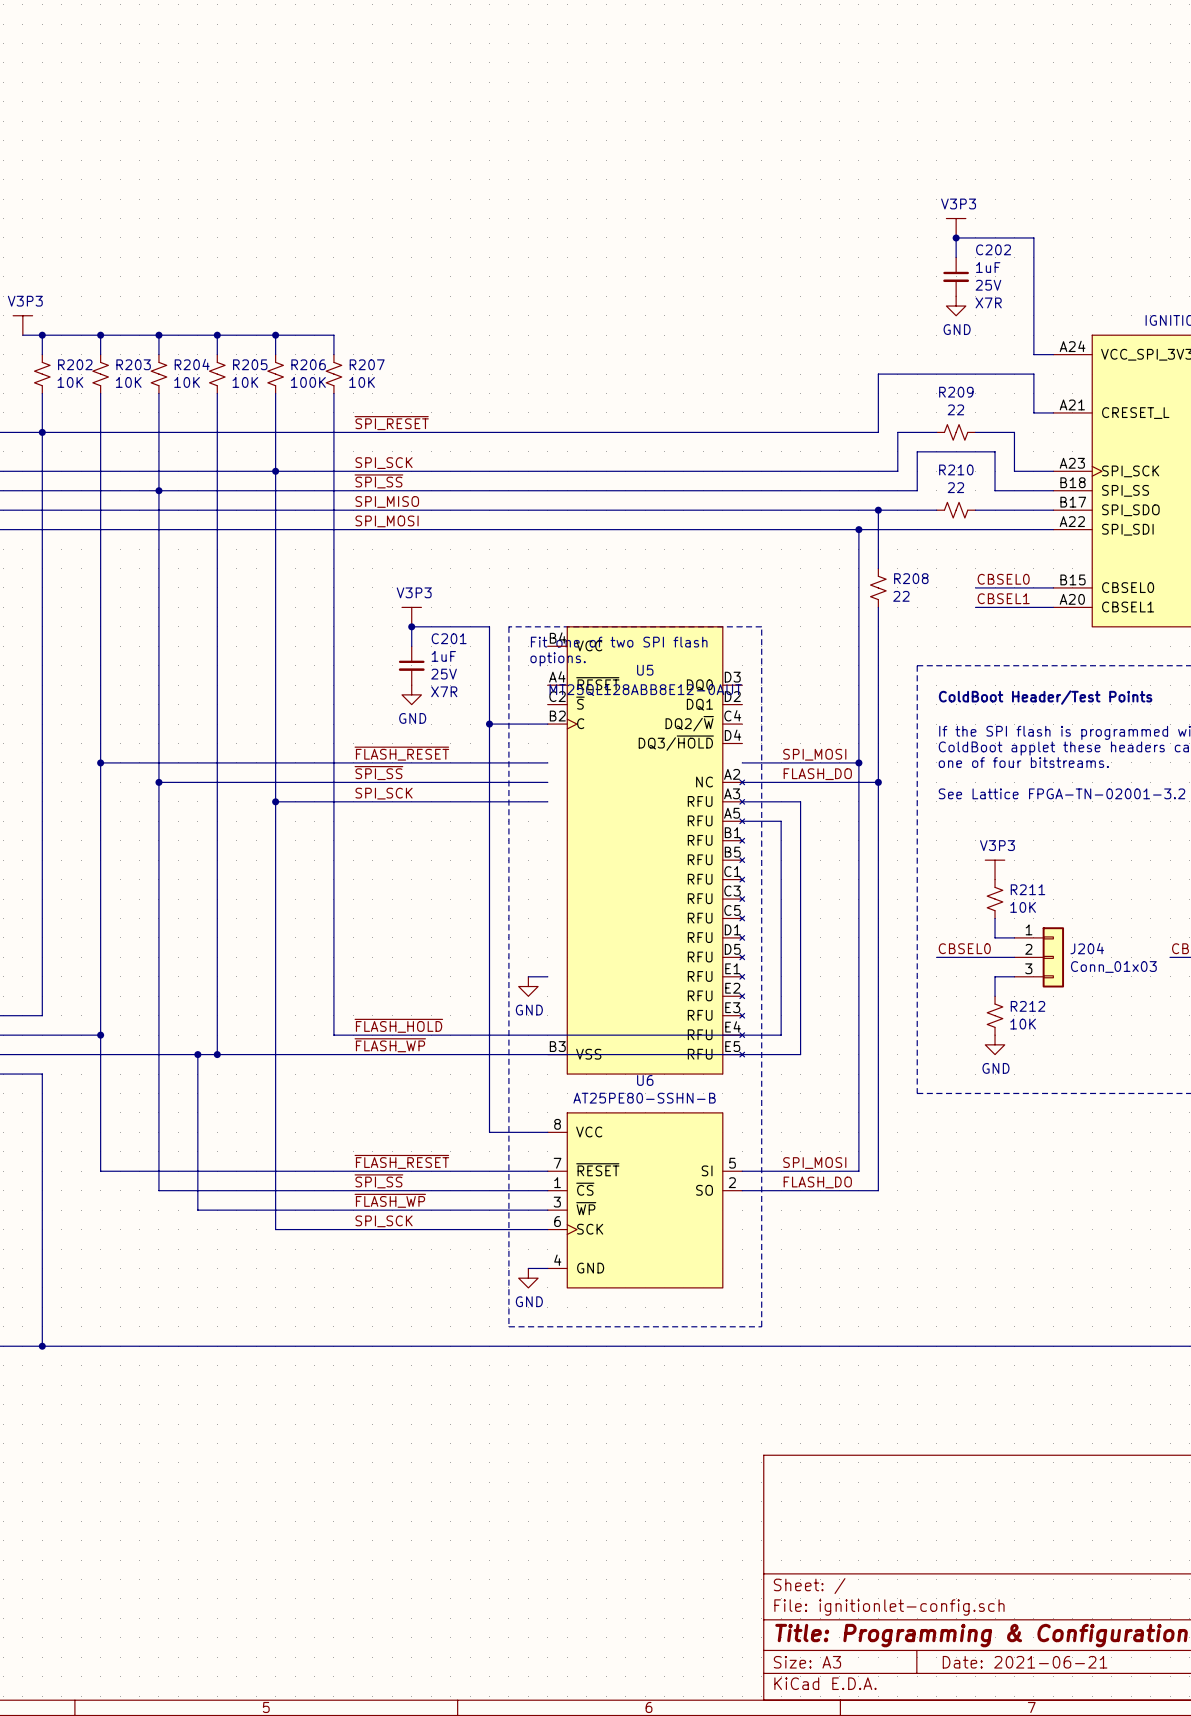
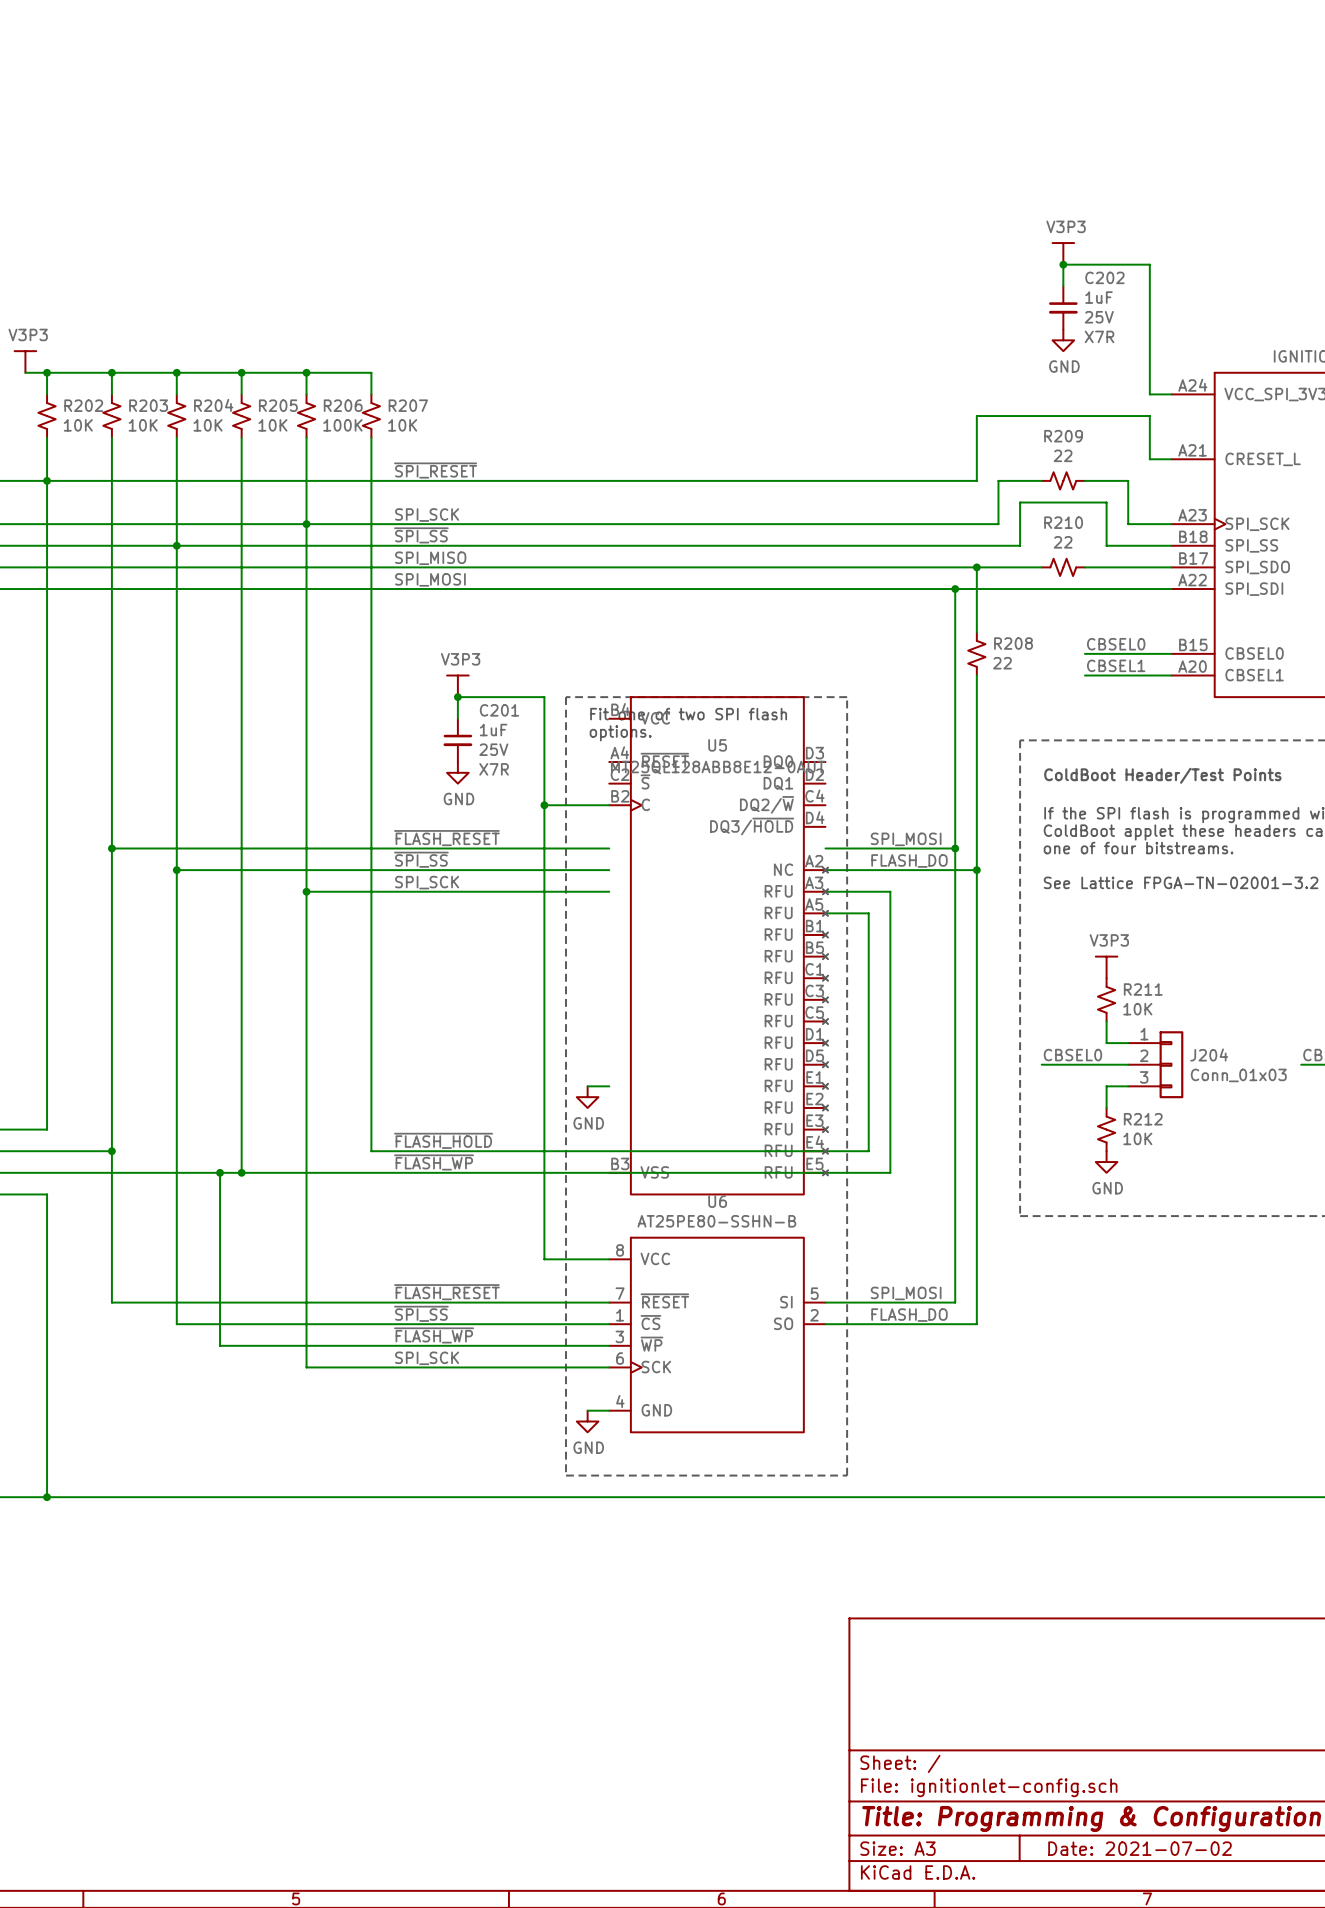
title block: Date: 2021-06-21 (1025, 1662) -> Date: 2021-07-02 (1140, 1848)

